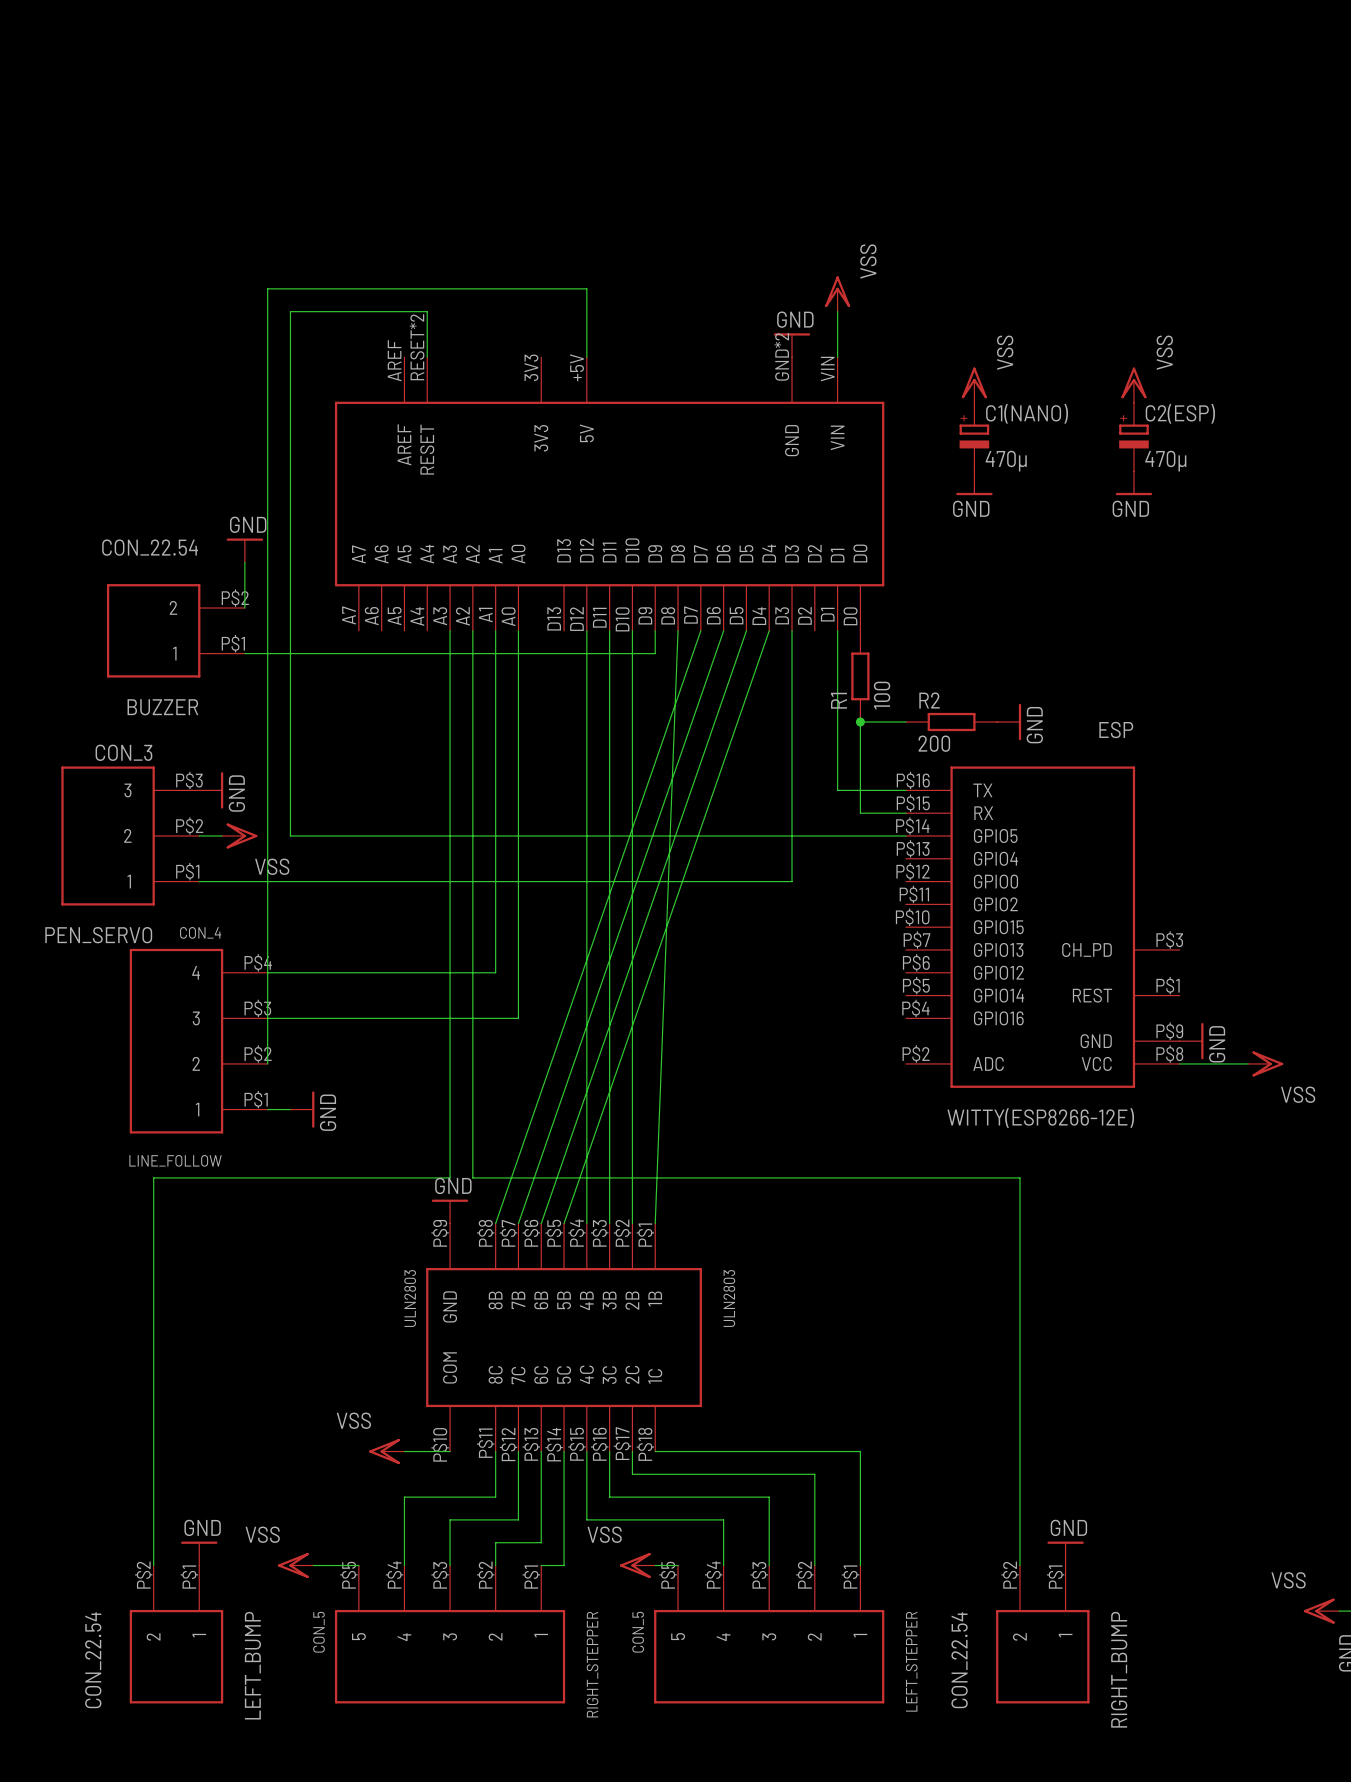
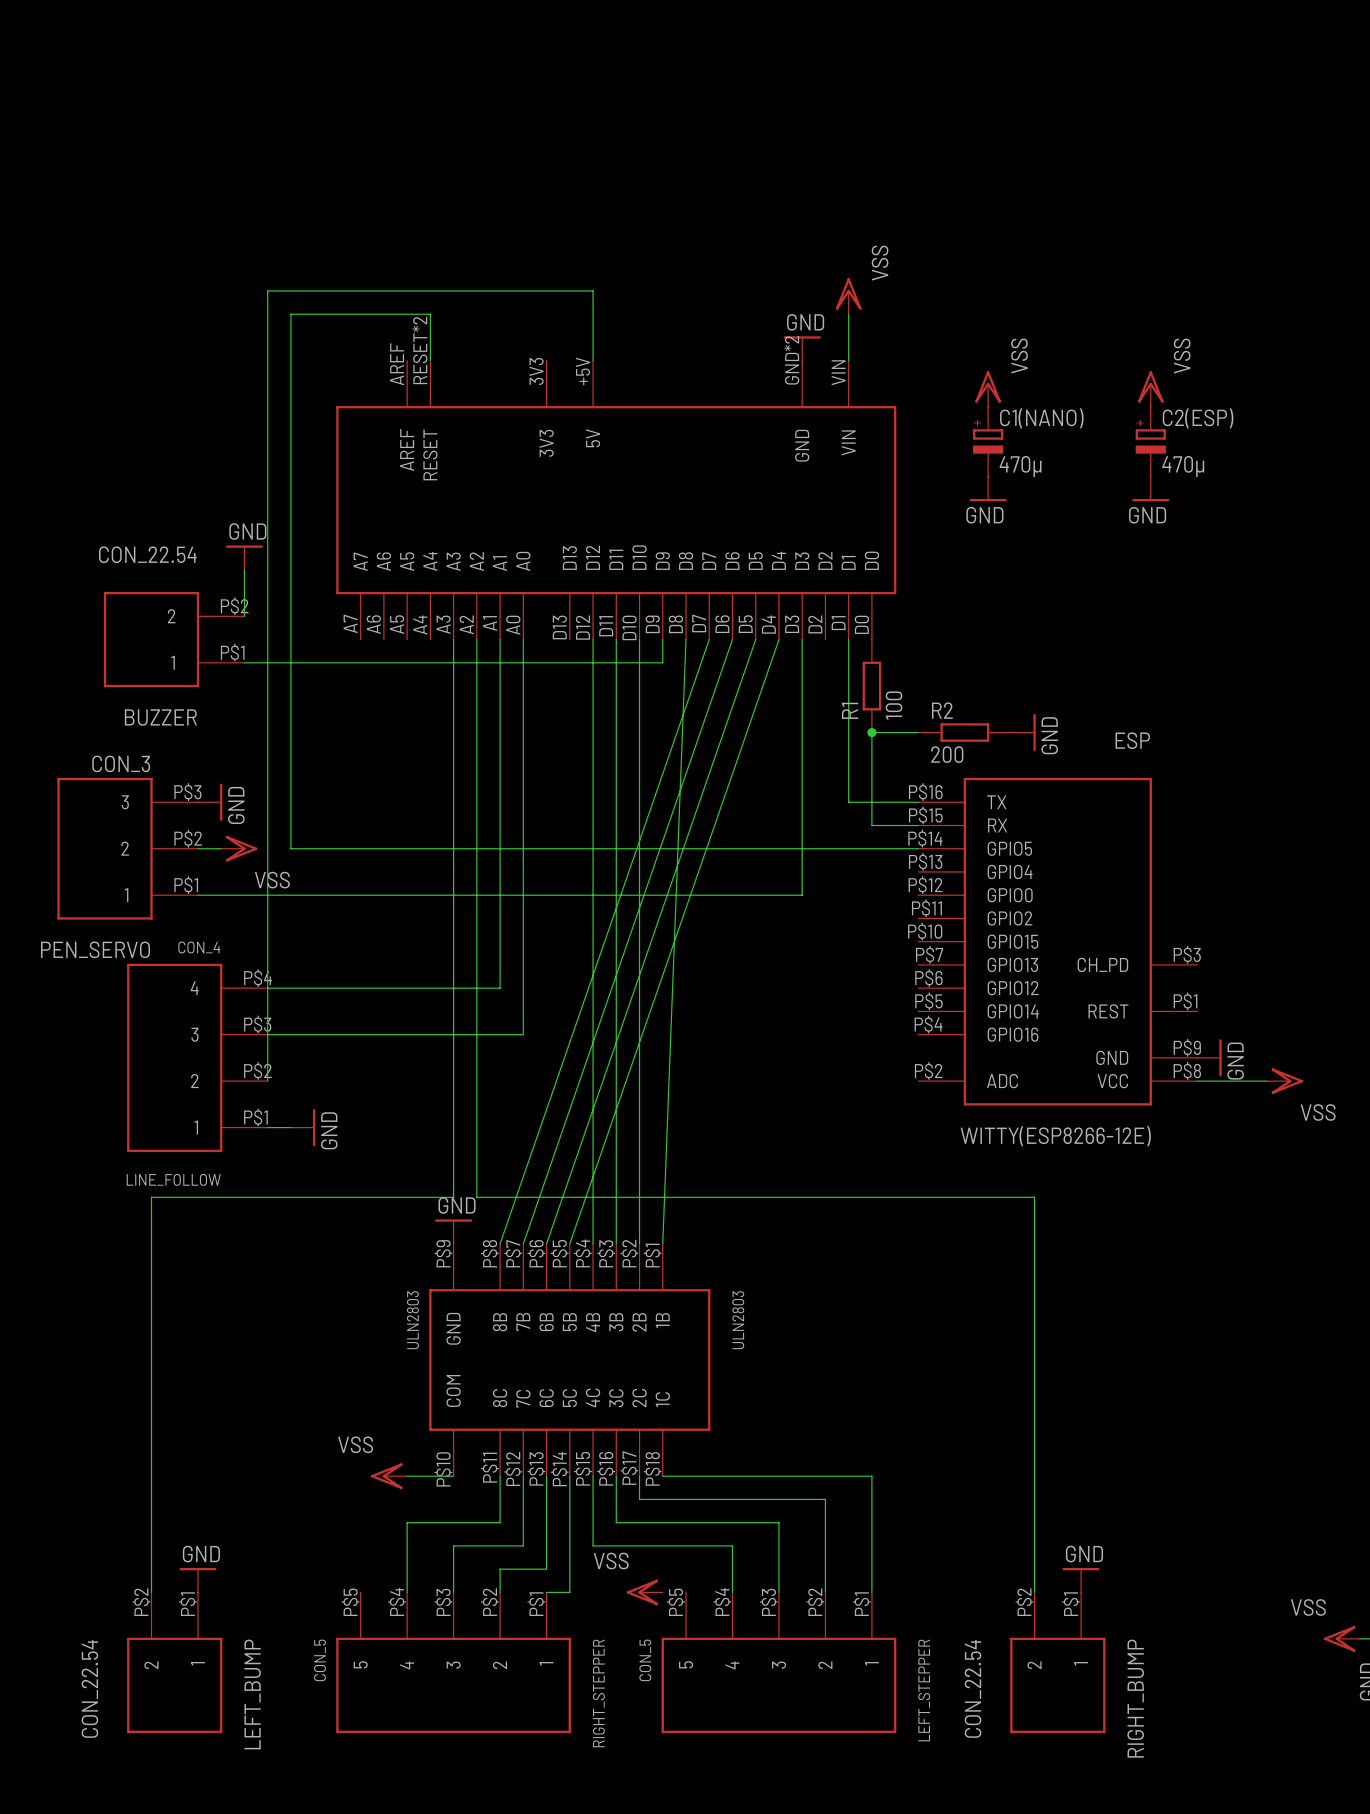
power symbol: VSS (295, 1565) -> none
wire: (313, 1565) (358, 1565) -> none
wire: (655, 1565) (678, 1565) -> none

